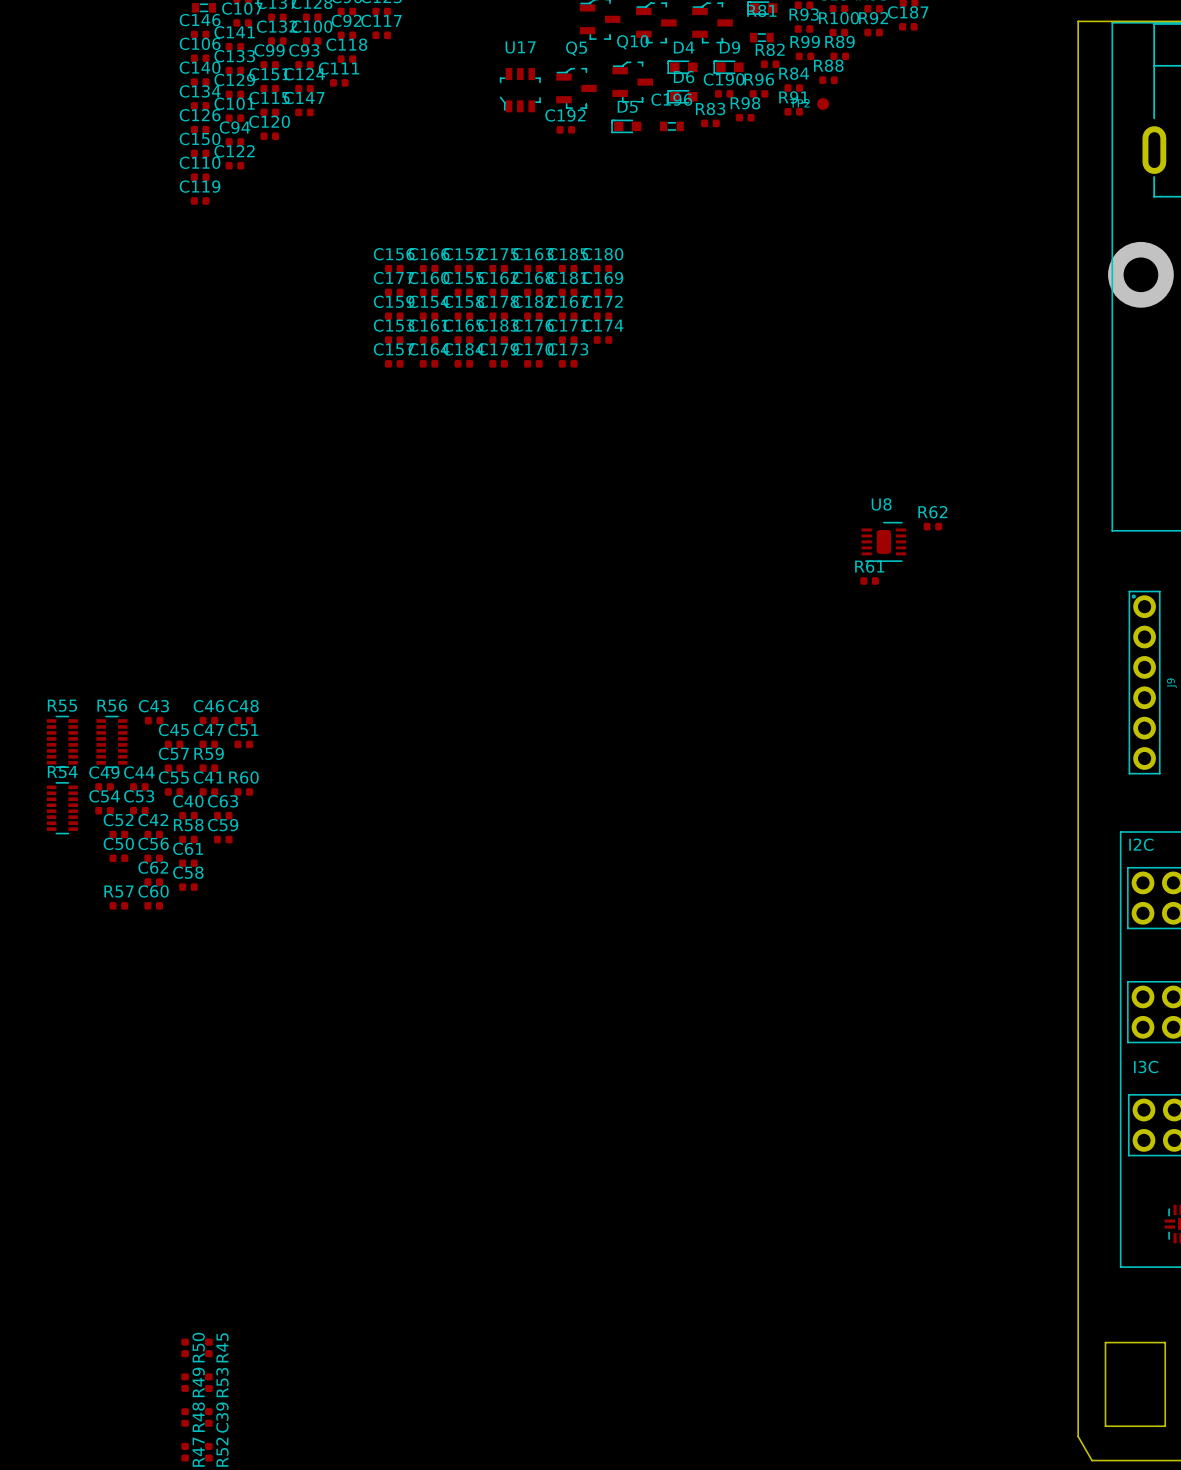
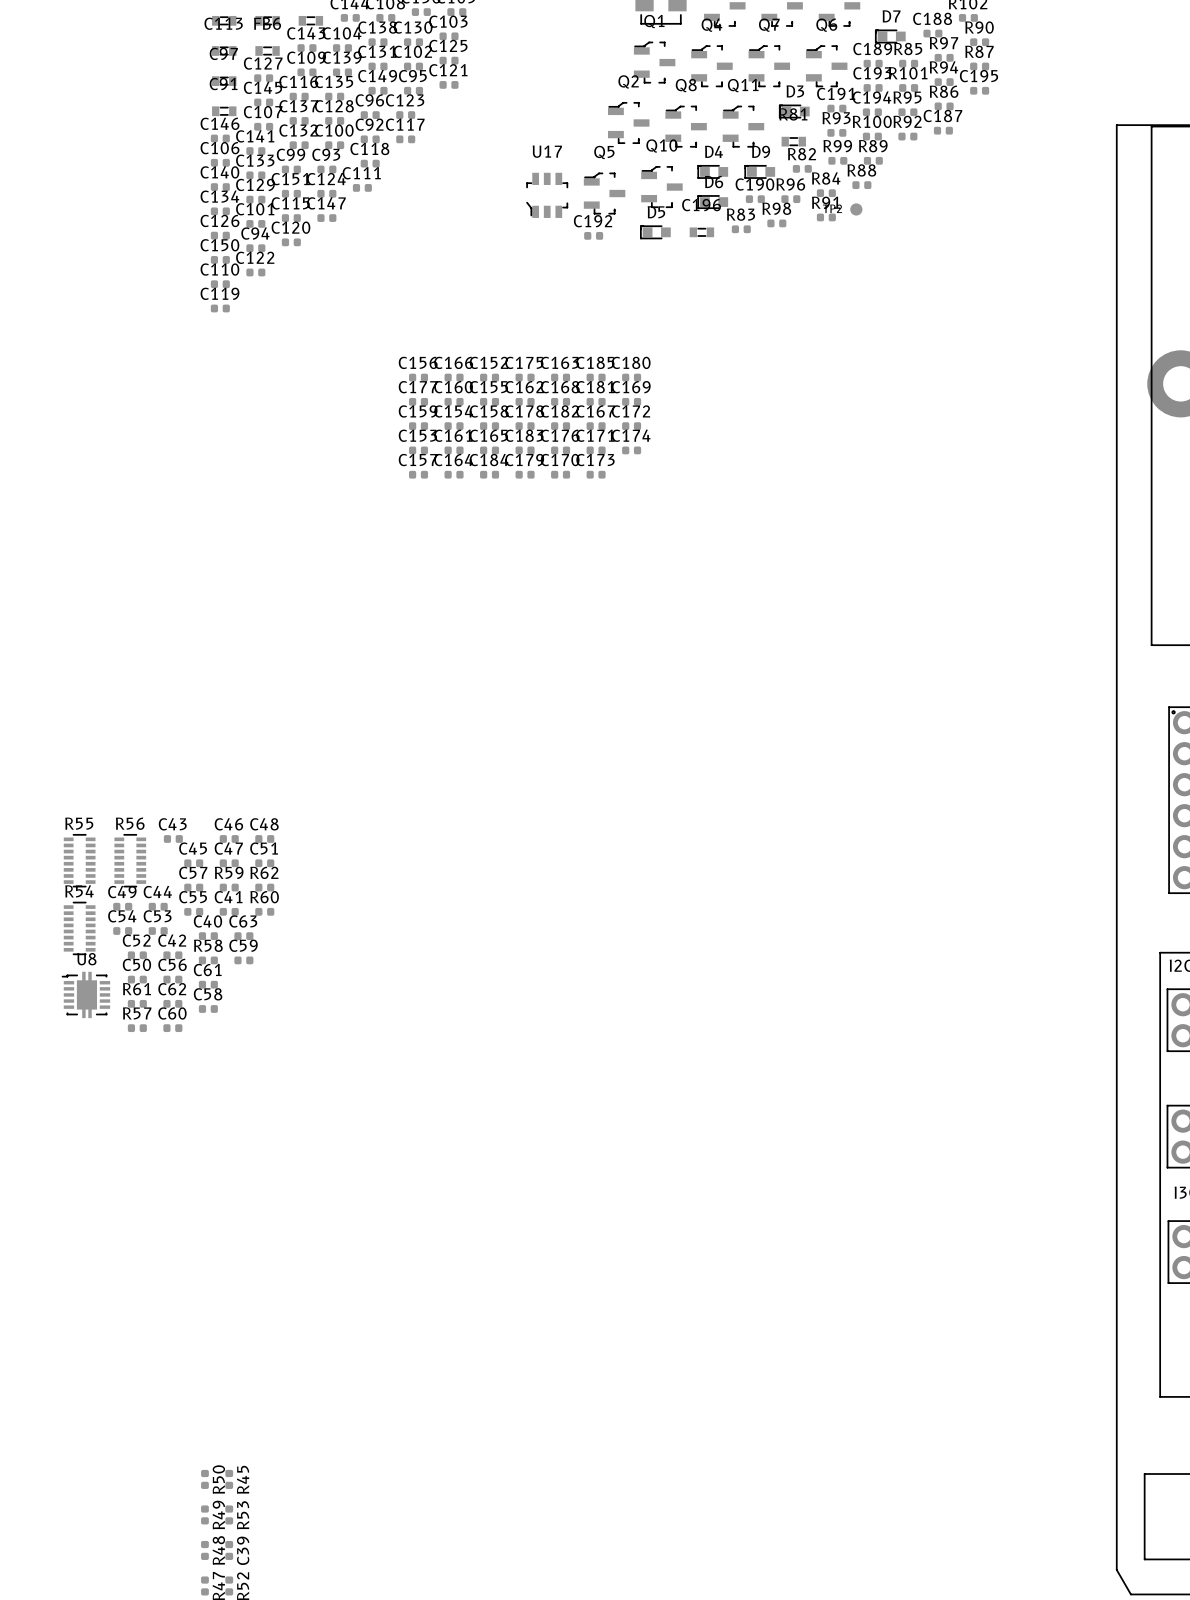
U8 footprint: [861, 521, 907, 562] -> [61, 971, 111, 1019]
R62 position: (932, 526) -> (264, 887)
R61 position: (869, 580) -> (137, 1003)

